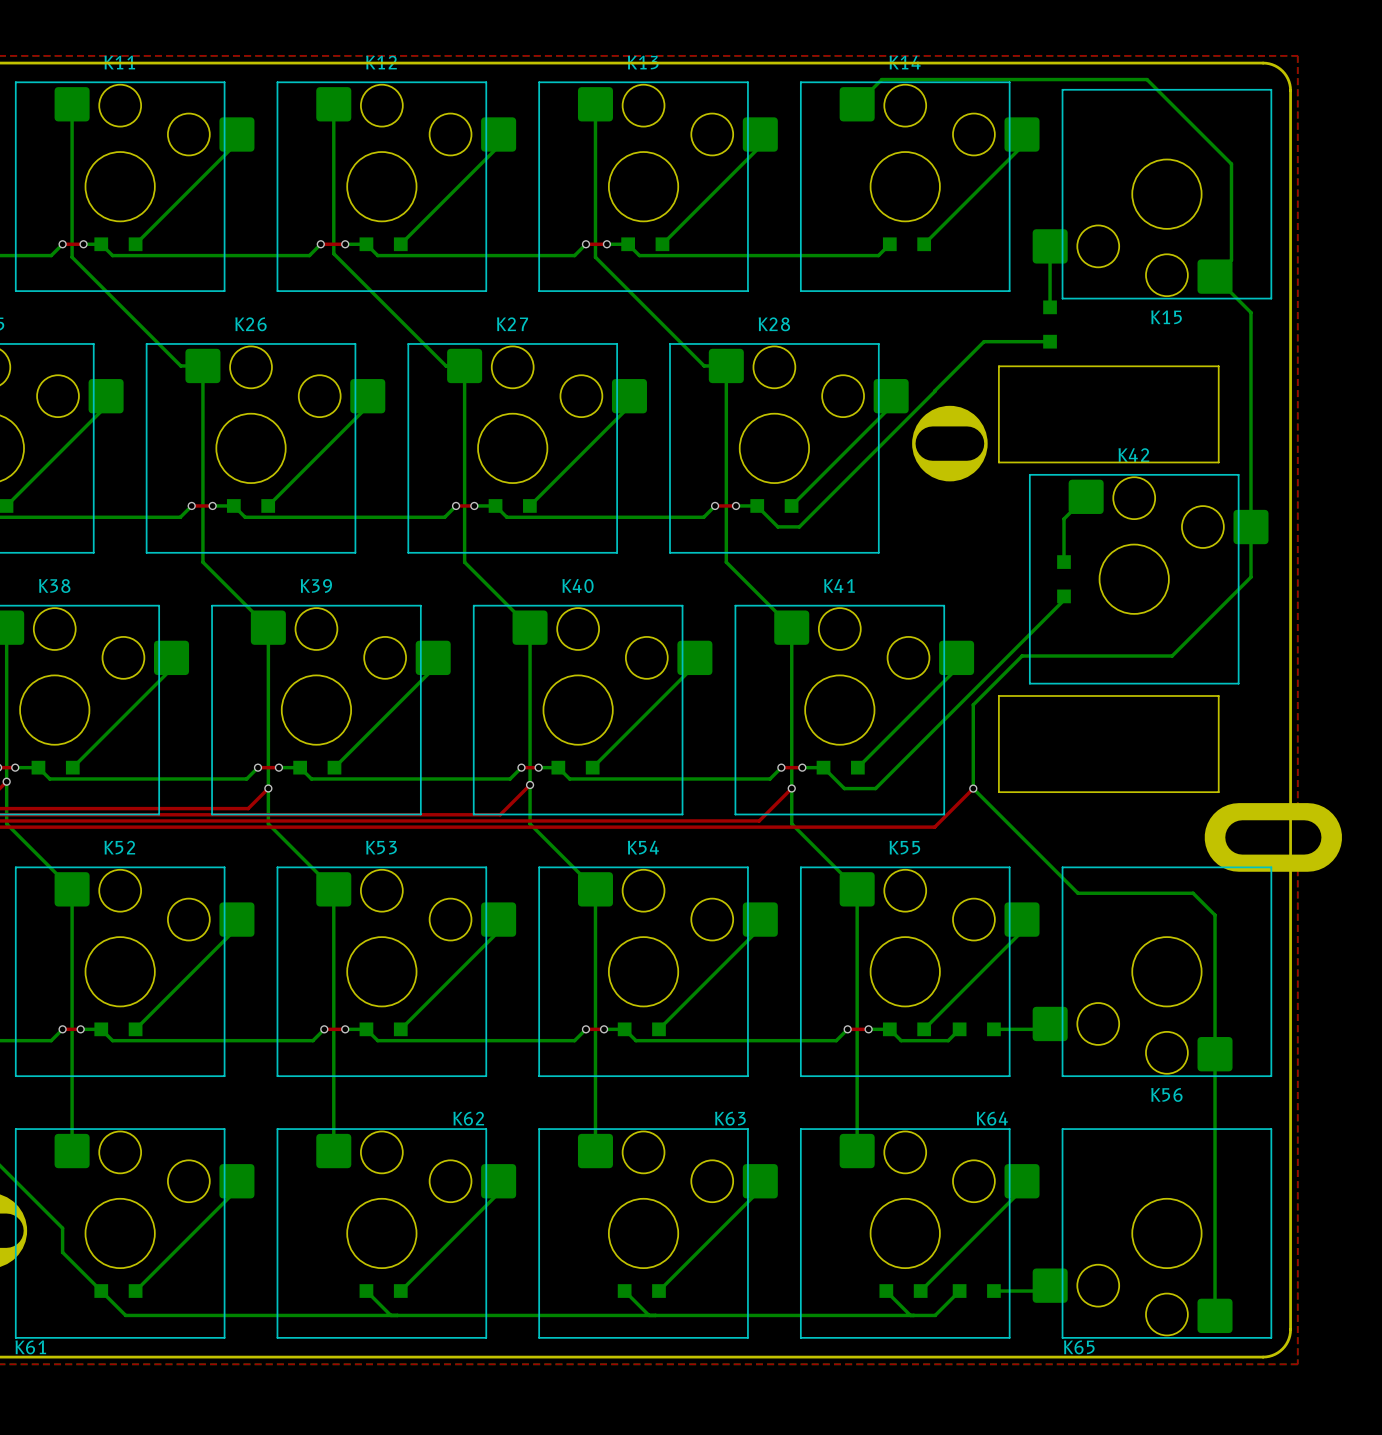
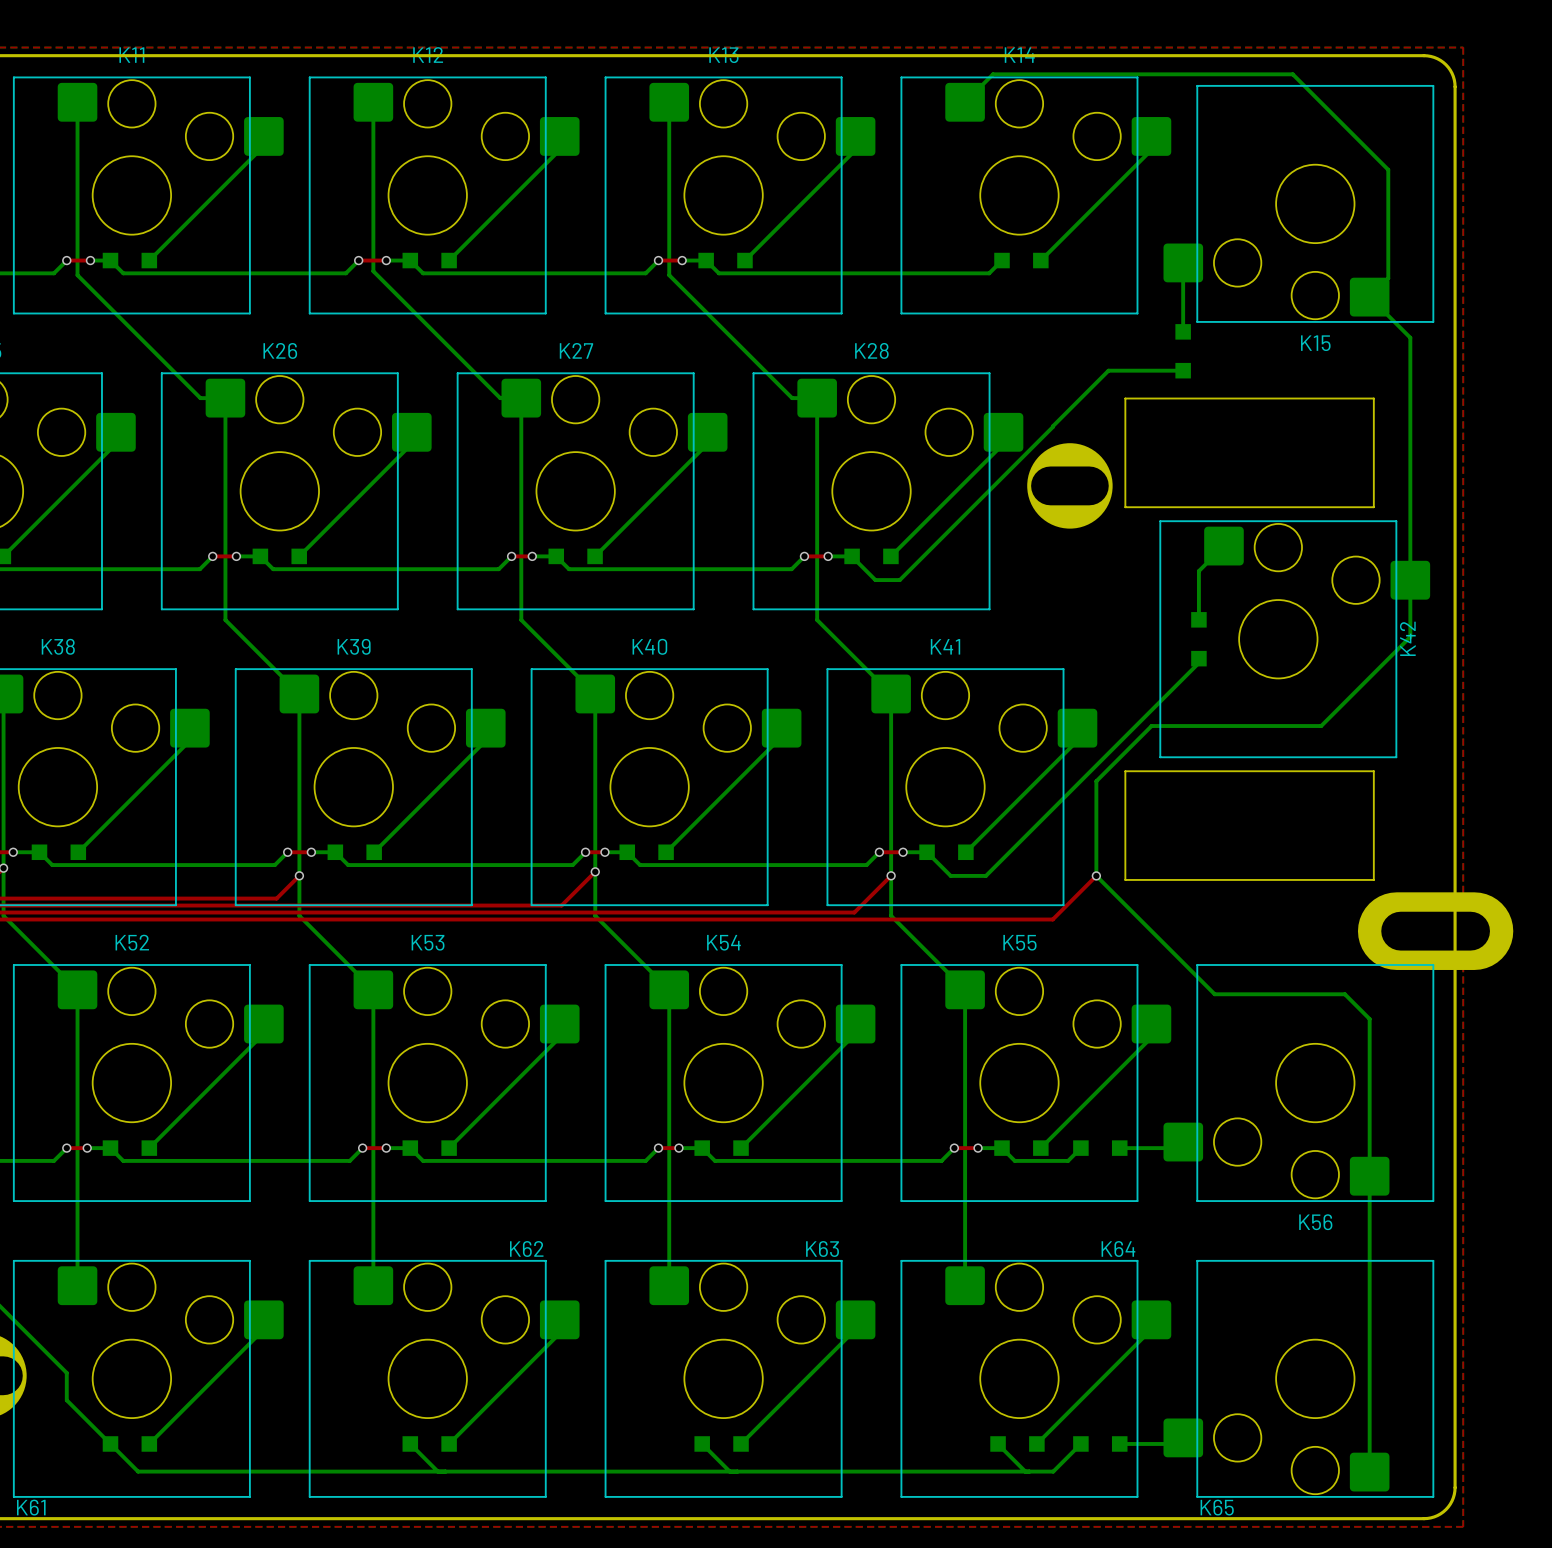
K42 name rotation: 0° (1133, 455) -> 90° counterclockwise (1407, 638)
K42 name position: K42 (1133, 455) -> K42 (1407, 638)

